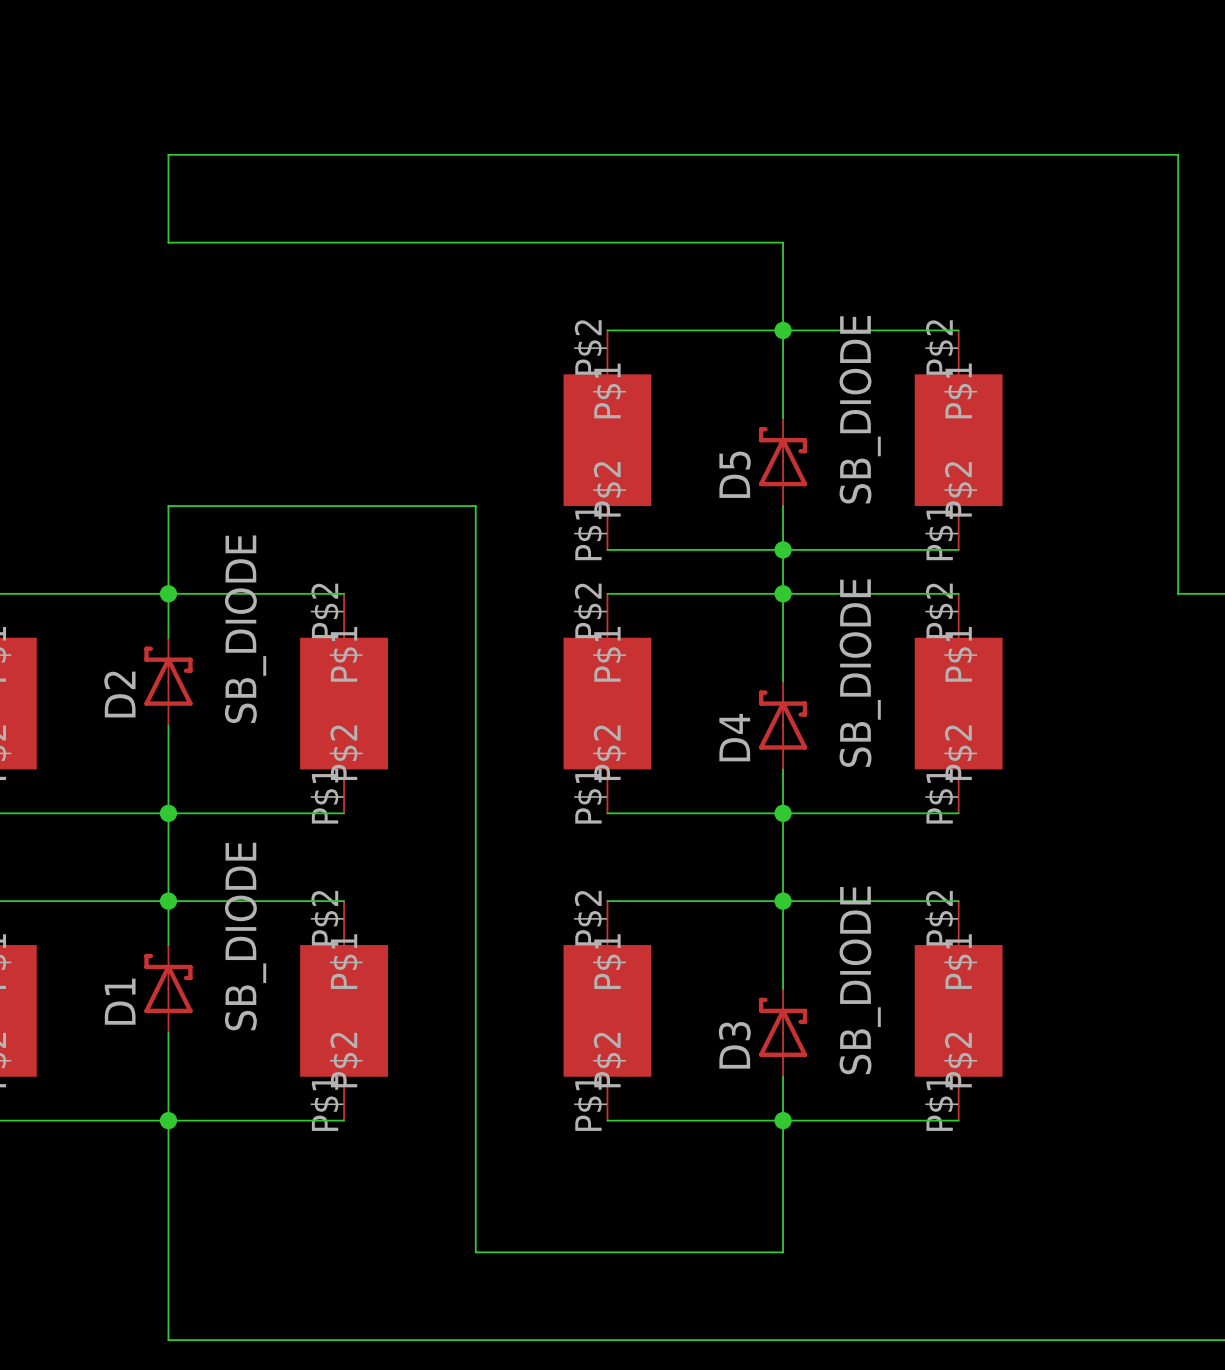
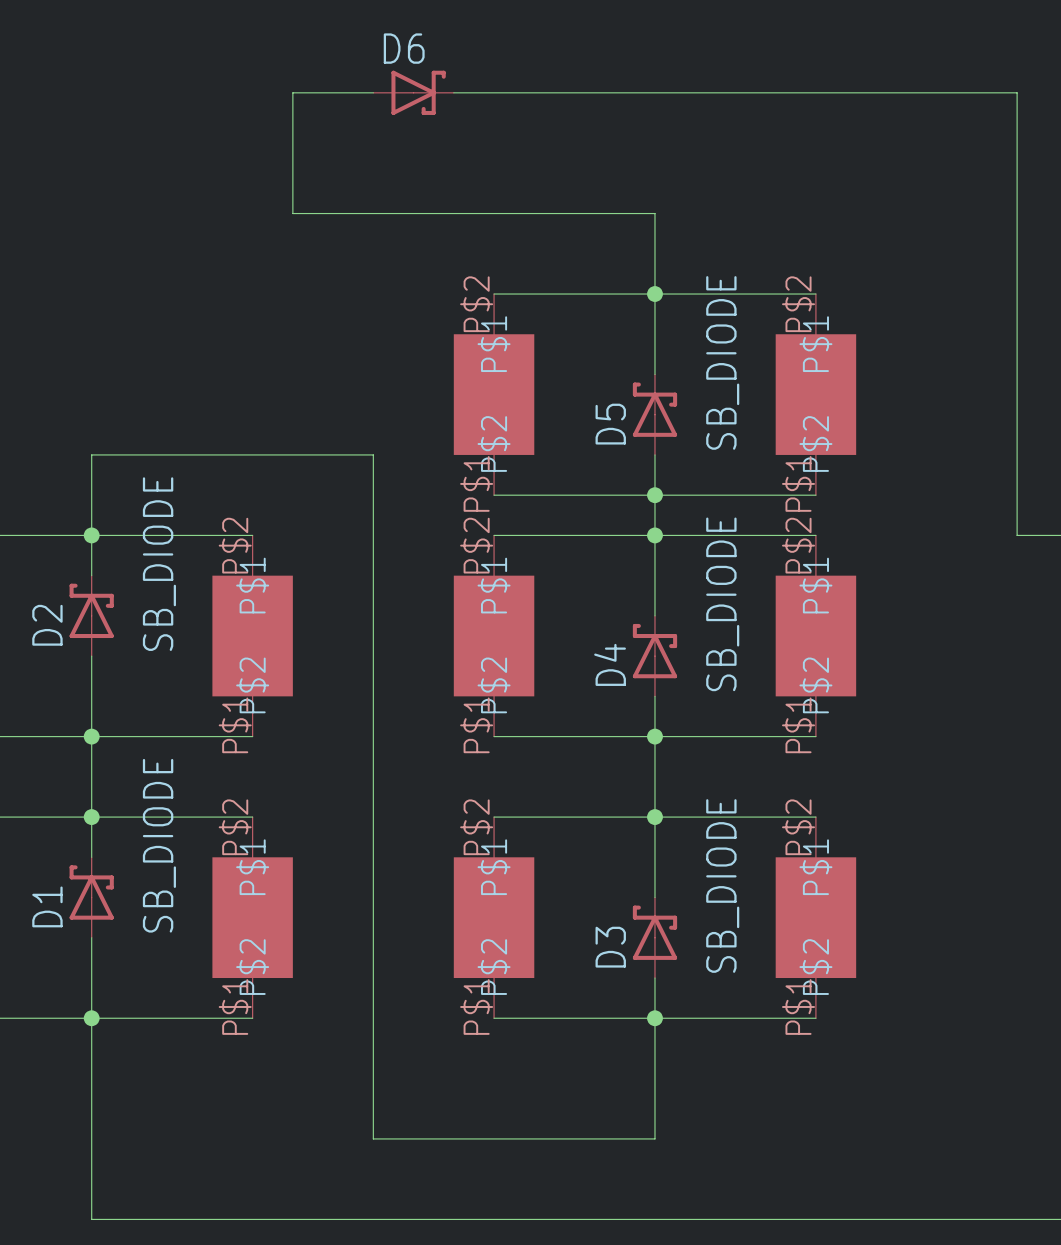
wire: none -> (373, 92) (292, 92) (292, 213)
D6: none -> (413, 92)
wire: (1178, 154) (168, 154) (168, 242) (387, 242) -> (1017, 133) (1017, 92) (453, 92)

